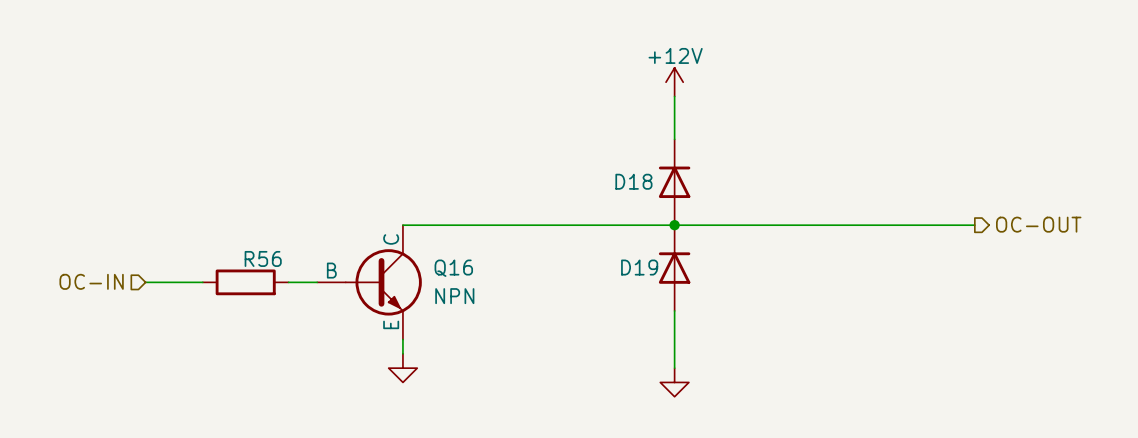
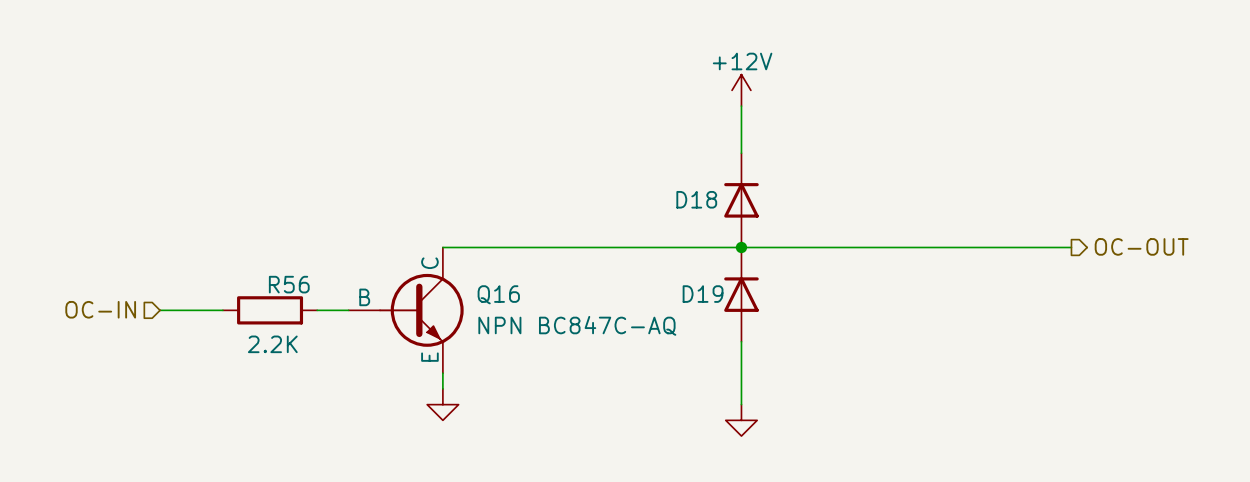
Q16 value: NPN (454, 296) -> NPN BC847C-AQ (577, 325)
R56 value: none -> 2.2K (272, 344)

